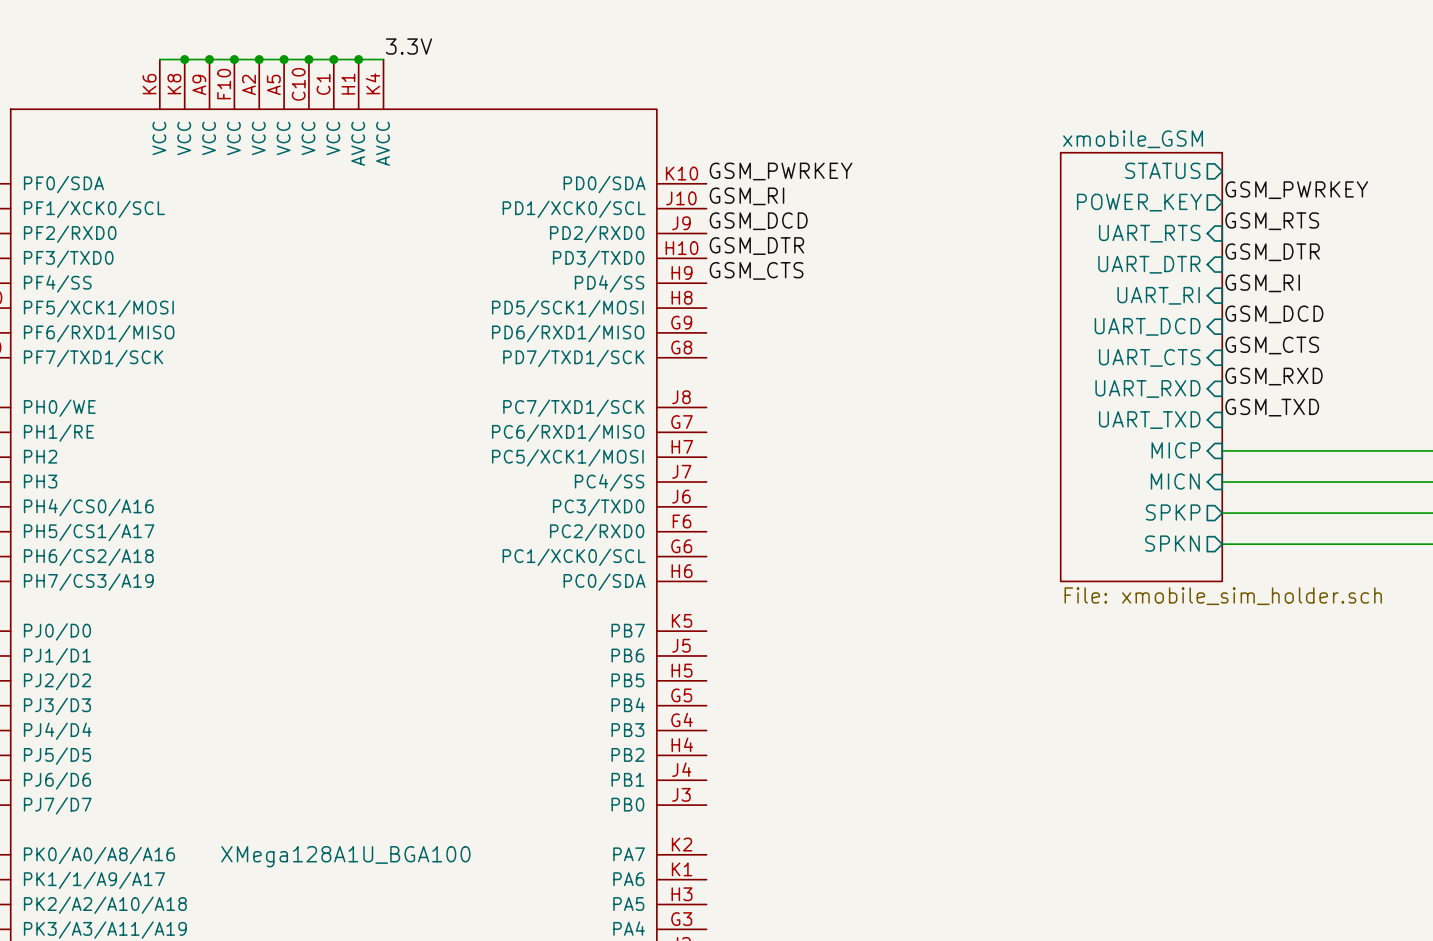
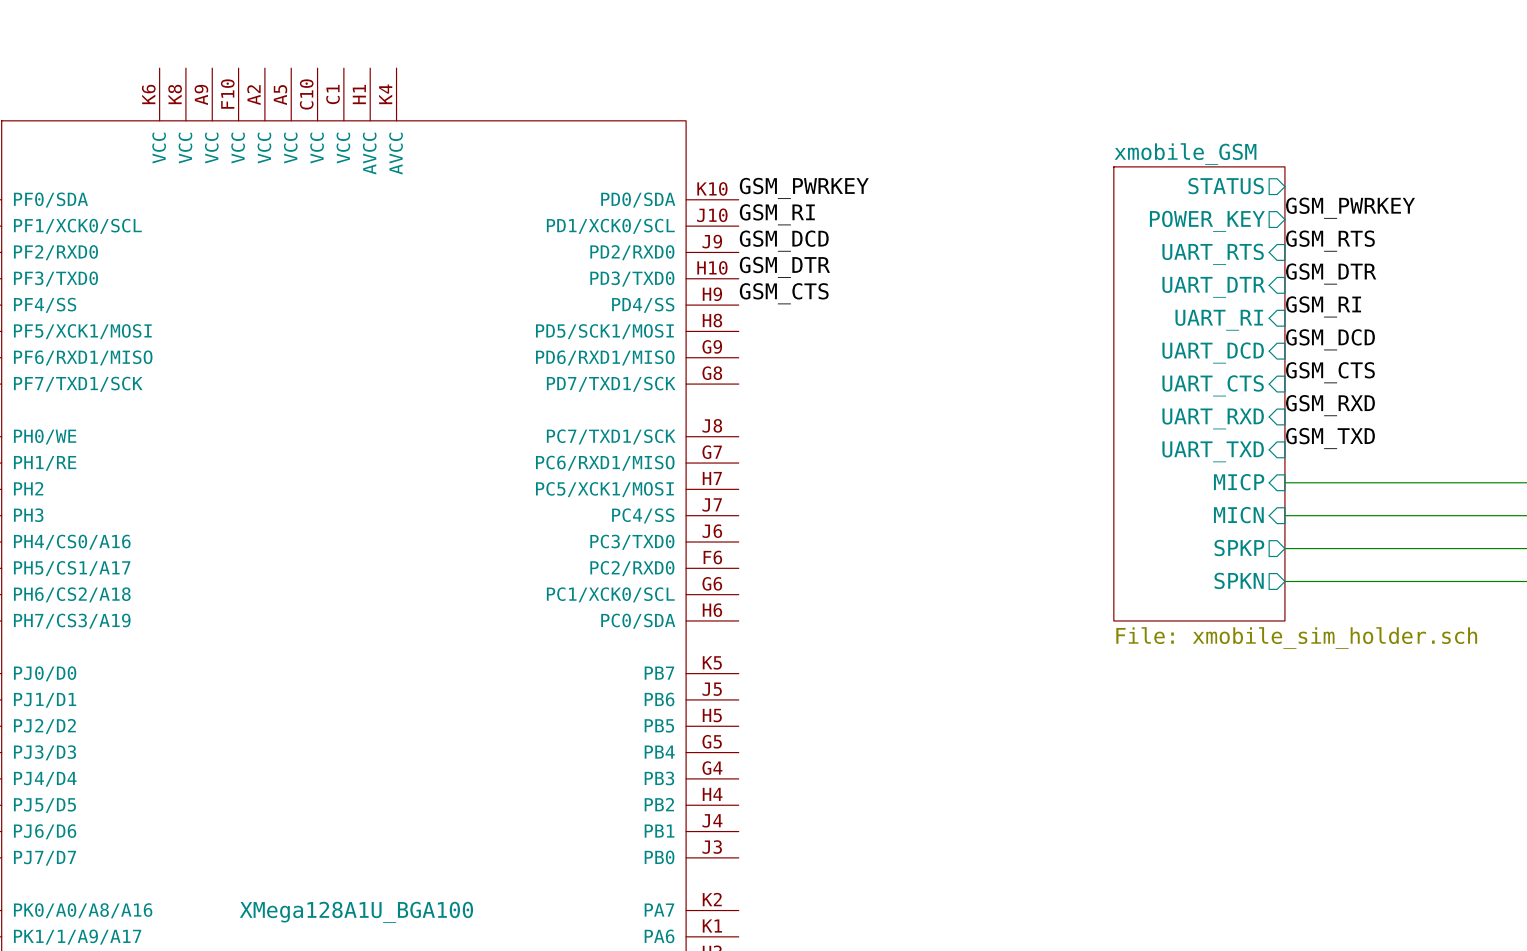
label: 3.3V (408, 46) -> none
wire: (159, 59) (383, 59) -> none
junction: (184, 59) -> none
junction: (209, 59) -> none
junction: (234, 59) -> none
junction: (259, 59) -> none
junction: (284, 59) -> none
junction: (308, 59) -> none
junction: (333, 59) -> none
junction: (358, 59) -> none

